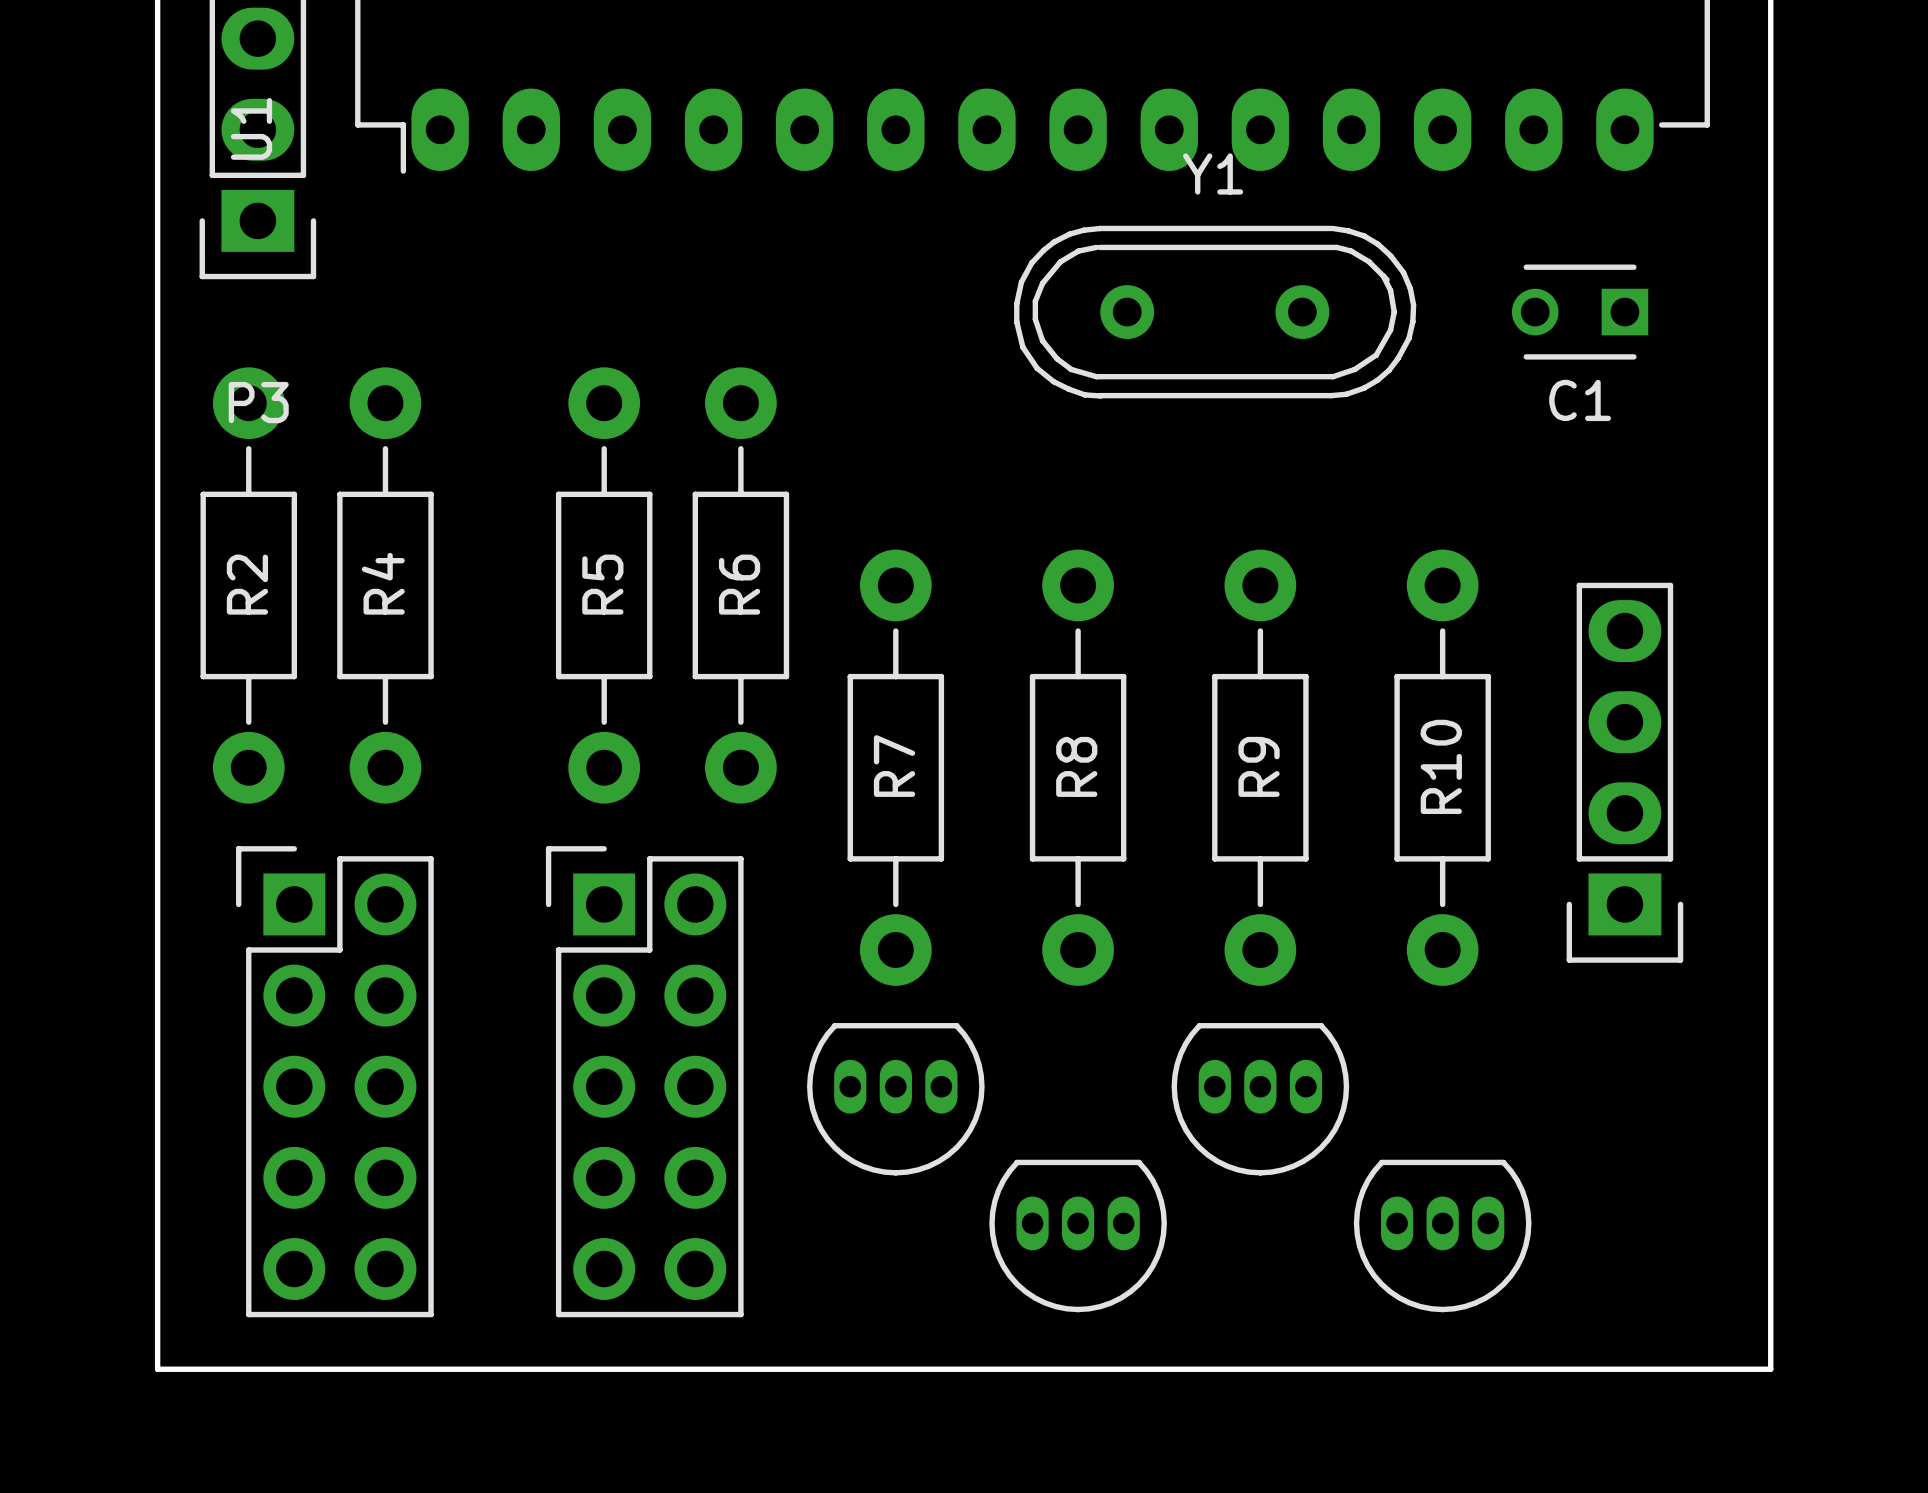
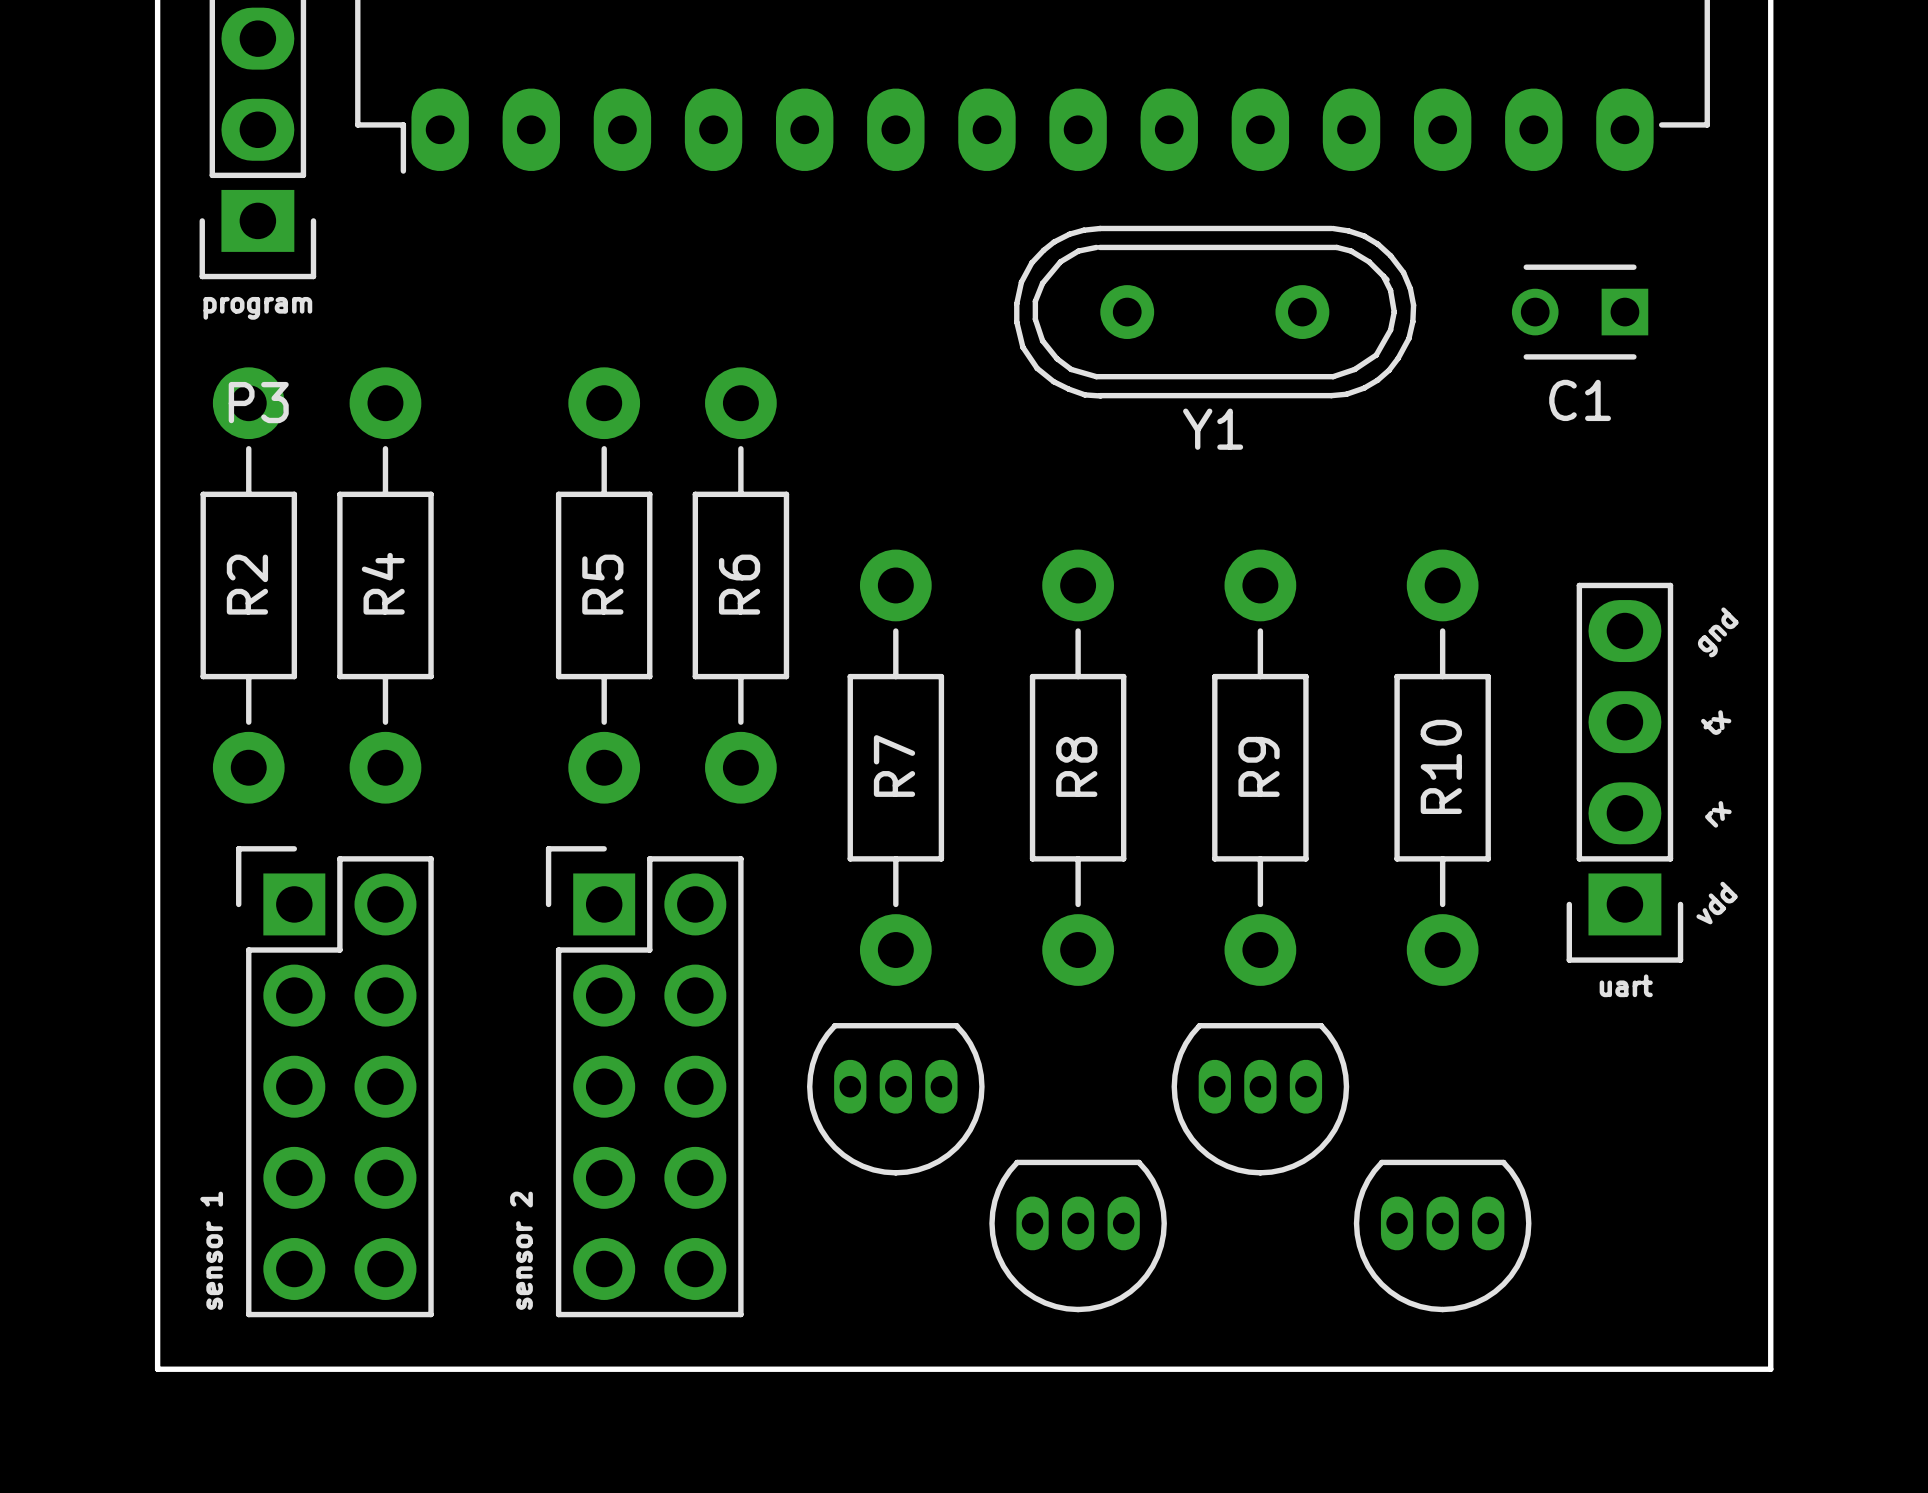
U1 name: U1 (251, 128) -> none
Y1 name position: Y1 (1213, 174) -> Y1 (1213, 429)
text: none -> program (257, 308)
text: none -> gnd (1718, 632)
text: none -> tx (1716, 722)
text: none -> rx (1718, 814)
text: none -> vdd (1717, 903)
text: none -> uart (1626, 985)
text: none -> sensor 1 (211, 1250)
text: none -> sensor 2 (521, 1250)

